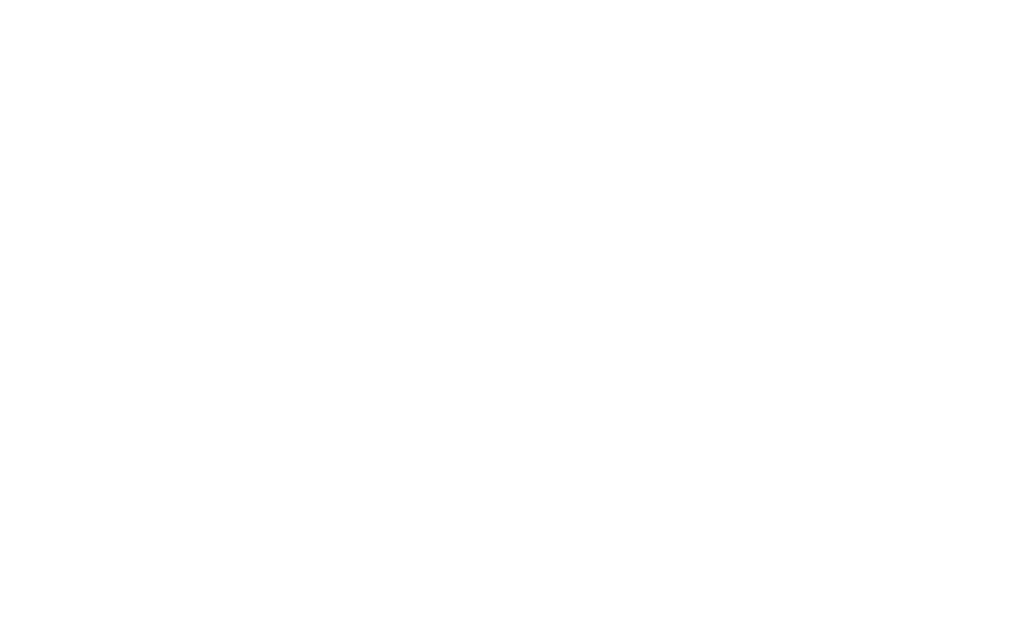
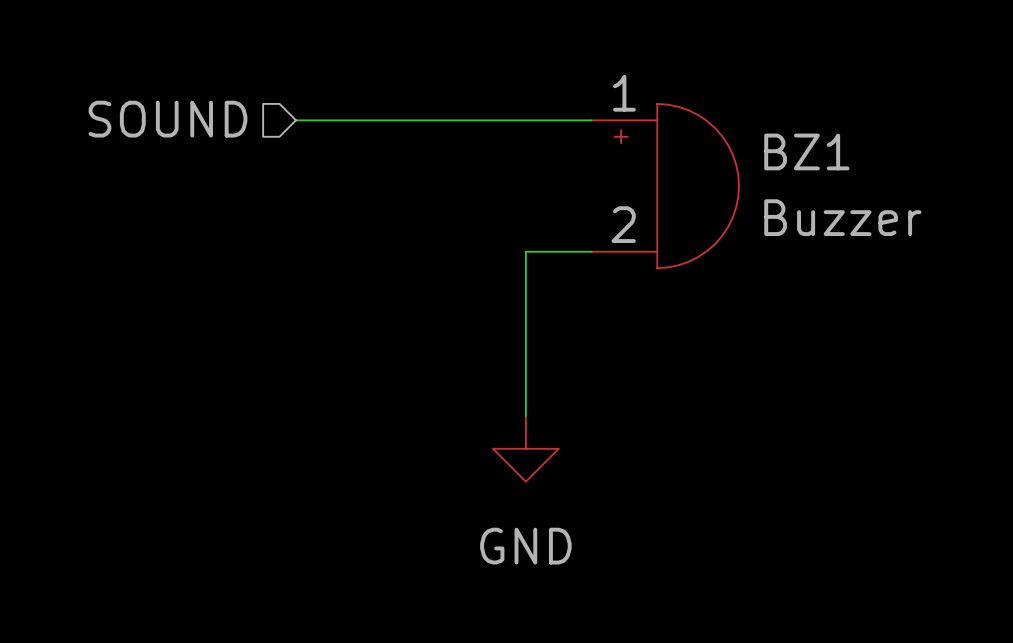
hierarchical label: none -> SOUND (168, 119)
wire: none -> (295, 120) (591, 120)
BZ1: none -> Buzzer (665, 186)
wire: none -> (591, 251) (525, 251) (525, 415)
power symbol: none -> GND (525, 448)

